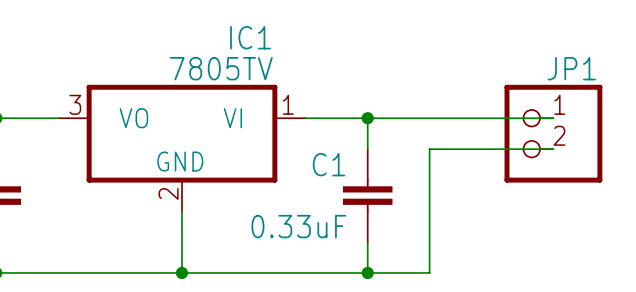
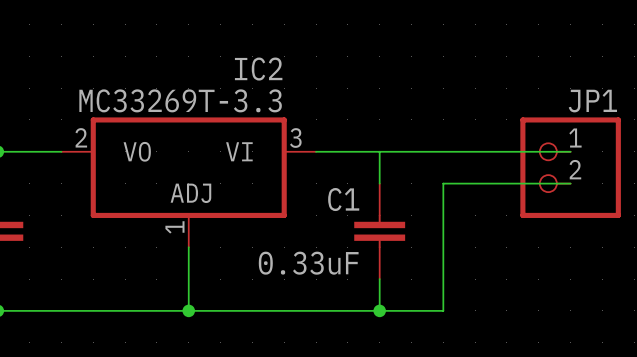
IC1 name: IC1 (250, 37) -> IC2 (258, 69)
IC1 value: 7805TV (221, 68) -> MC33269T-3.3 (180, 100)
IC1 pin number: 3 (75, 104) -> 2 (81, 137)
IC1 pin number: 1 (288, 104) -> 3 (295, 138)
junction: (367, 118) -> none
IC1 text: none -> ADJ (190, 193)
IC1 text: GND (180, 161) -> none
IC1 pin number: 2 (168, 193) -> 1 (174, 227)

